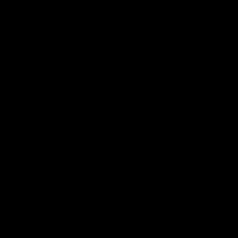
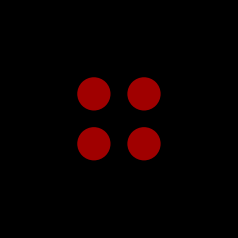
part: none -> (93, 93)
part: none -> (143, 93)
part: none -> (93, 143)
part: none -> (143, 143)

